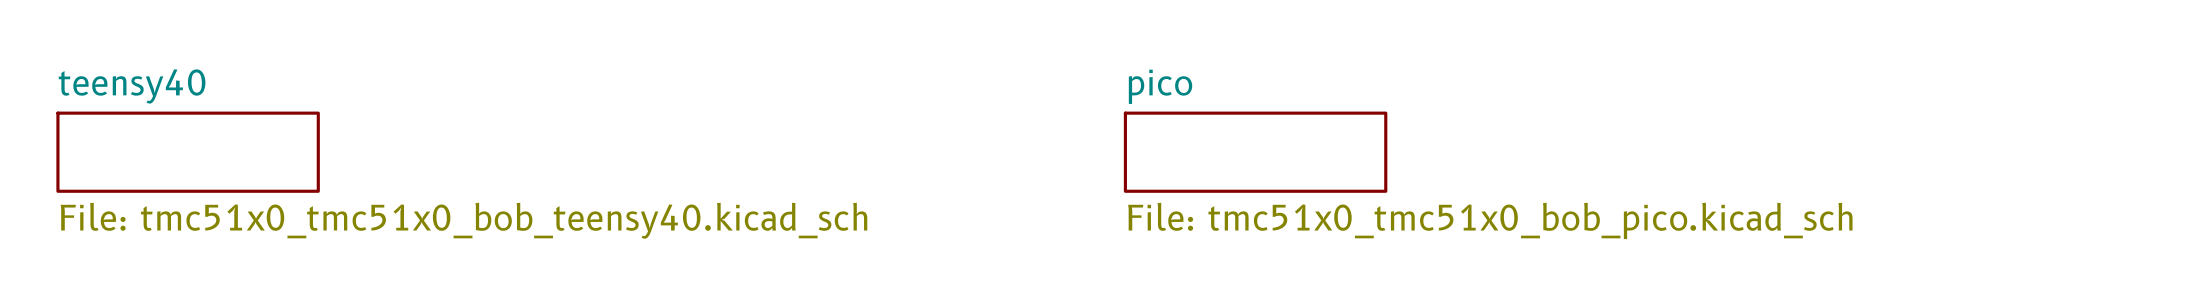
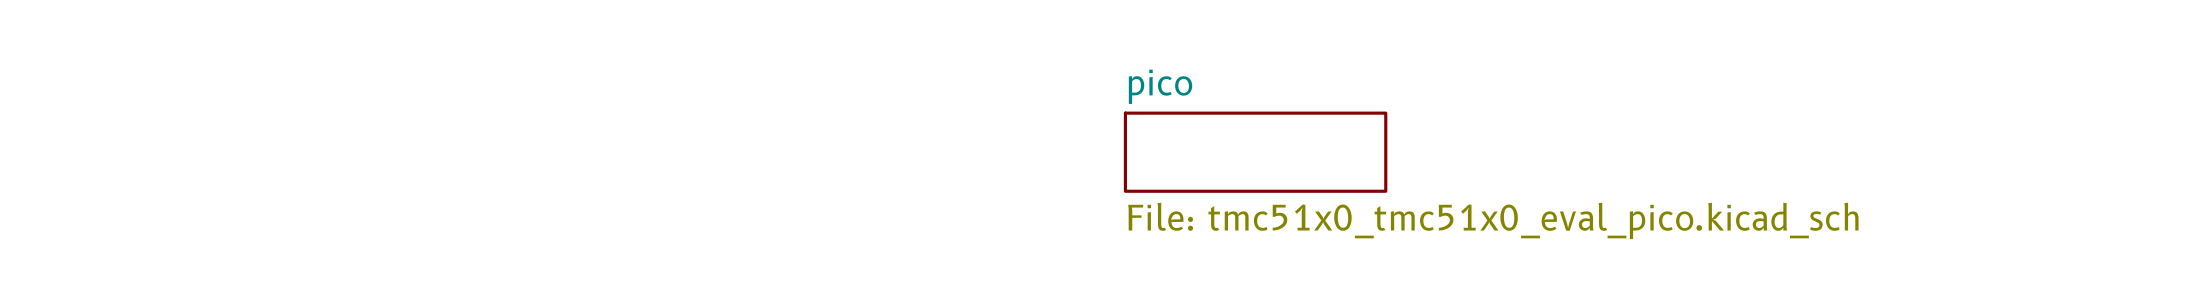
sheet teensy40: File: tmc51x0_tmc51x0_bob_teensy40.kicad_sch (188, 152) -> none
sheet pico value: File: tmc51x0_tmc51x0_bob_pico.kicad_sch (1490, 220) -> File: tmc51x0_tmc51x0_eval_pico.kicad_sch (1493, 220)

